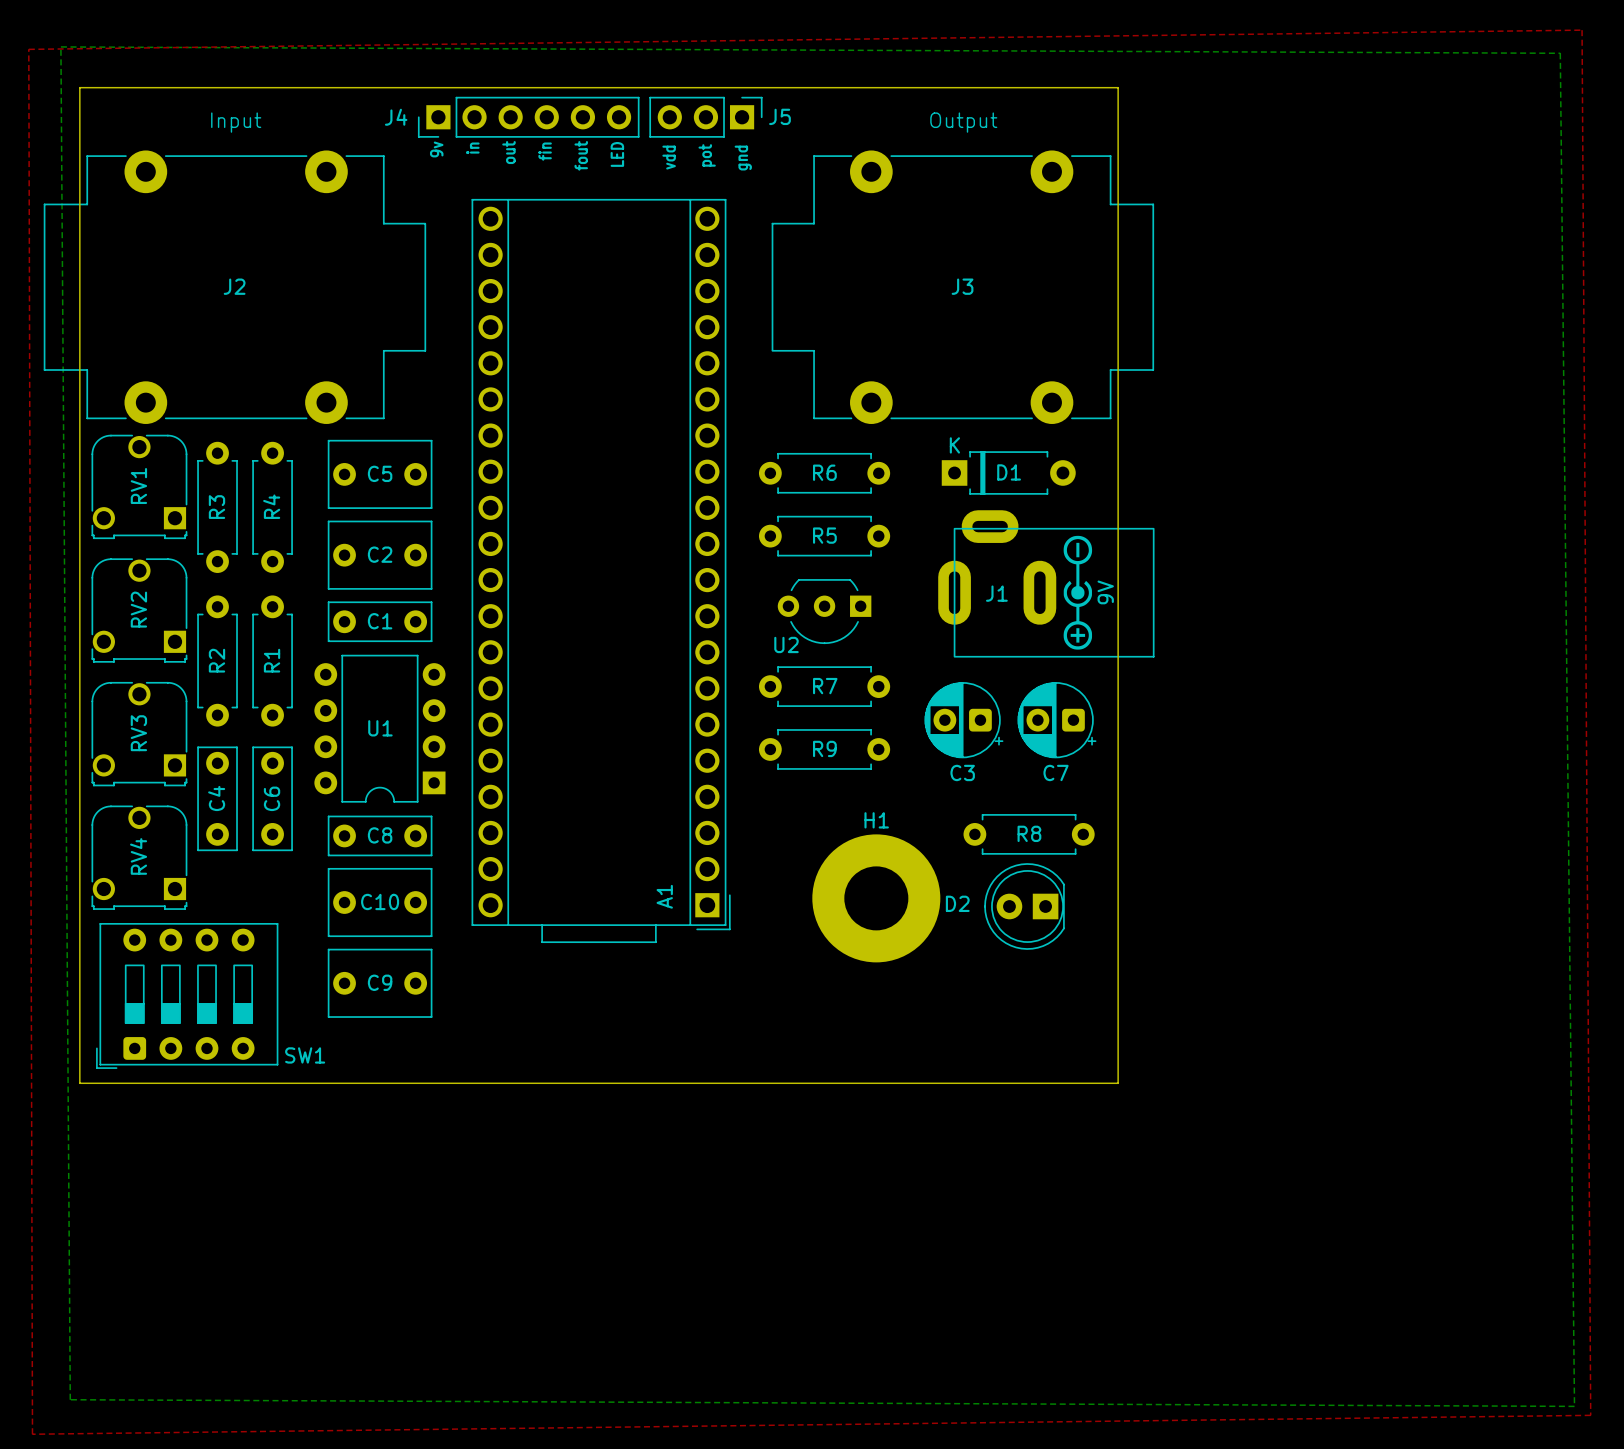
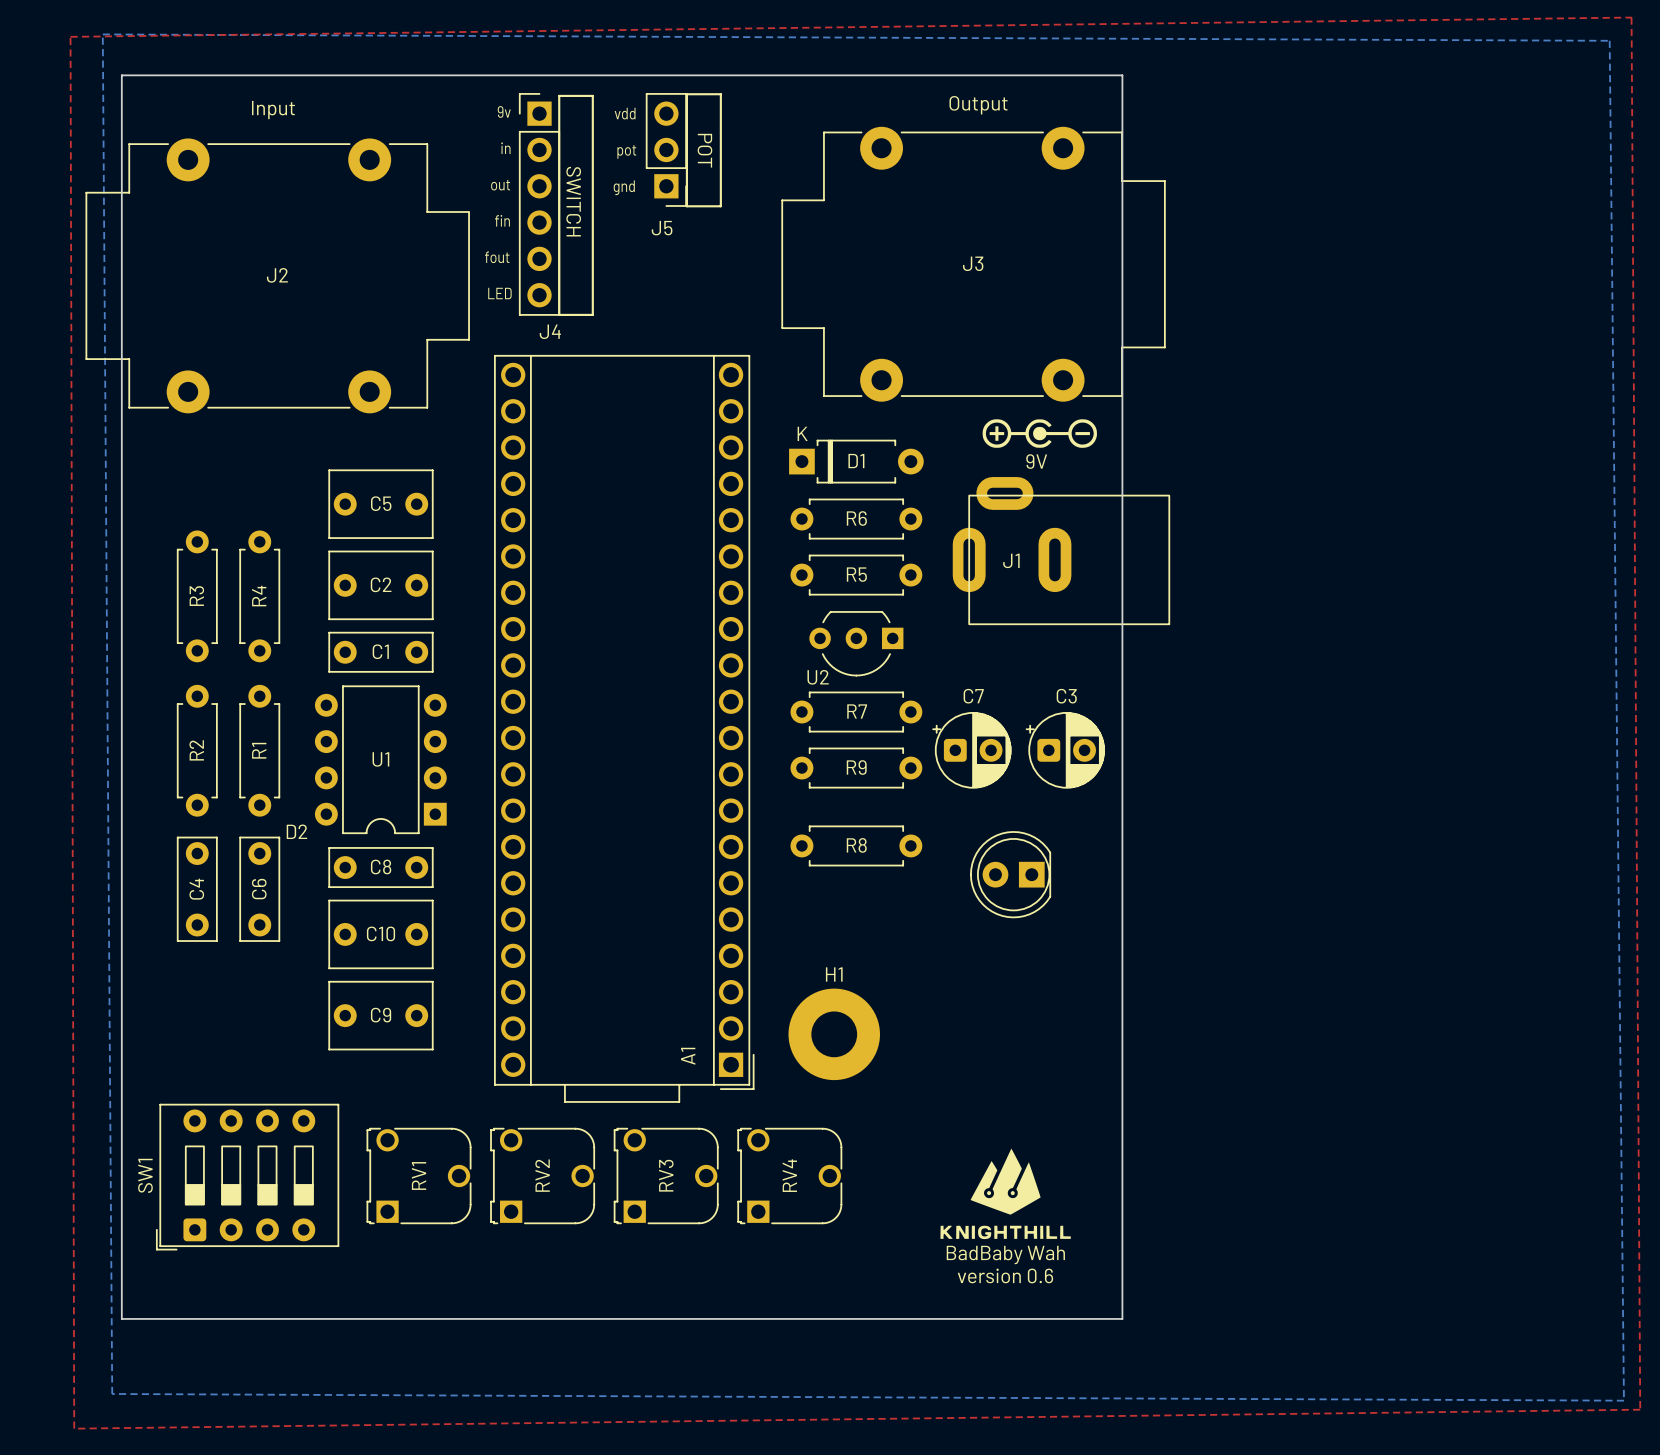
board edge: (1075, 87) (1118, 87) (1118, 1083) (79, 1083) -> (1122, 75) (1122, 1318) (121, 1318) (121, 1075)
line: none -> (686, 94) (720, 94) (720, 206) (686, 206) (686, 94)
line: none -> (559, 95) (592, 95) (592, 314) (559, 314) (559, 95)
J4 name position: J4 (396, 117) -> J4 (550, 331)
J4 rotation: 0° (528, 117) -> 90° clockwise (539, 204)
J5 rotation: 0° (705, 117) -> 90° clockwise (666, 149)
J5 position: (705, 117) -> (666, 149)
text position: Output (963, 122) -> Output (978, 105)
text rotation: 0° (472, 148) -> 90° clockwise (505, 148)
text rotation: 0° (436, 149) -> 90° clockwise (504, 111)
text position: 9v (436, 149) -> 9v (504, 111)
text rotation: 0° (545, 151) -> 90° clockwise (502, 220)
text position: fin (545, 151) -> fin (502, 220)
text rotation: 0° (508, 152) -> 90° clockwise (500, 185)
text position: out (508, 152) -> out (500, 185)
text rotation: 0° (617, 154) -> 90° clockwise (499, 293)
text position: LED (617, 154) -> LED (499, 293)
text rotation: 0° (581, 155) -> 90° clockwise (497, 257)
text position: fout (581, 155) -> fout (497, 257)
text rotation: 0° (707, 155) -> 90° clockwise (626, 151)
text position: pot (707, 155) -> pot (626, 151)
text rotation: 0° (669, 157) -> 90° clockwise (625, 113)
text position: vdd (669, 157) -> vdd (625, 113)
text rotation: 0° (743, 158) -> 90° clockwise (624, 187)
text position: gnd (743, 158) -> gnd (624, 187)
text: none -> POT (704, 150)
text: none -> SWITCH (573, 201)
J3 position: (962, 287) -> (973, 264)
drawing: none -> [982, 419, 1097, 448]
D1 position: (1008, 472) -> (856, 461)
R6 position: (824, 473) -> (856, 519)
C5 position: (380, 474) -> (380, 504)
RV1 rotation: 0° (139, 486) -> 90° clockwise (419, 1176)
RV1 position: (139, 486) -> (419, 1176)
R3 position: (217, 507) -> (197, 596)
R4 position: (272, 507) -> (259, 596)
drawing: [1063, 535, 1093, 650] -> none
R5 position: (824, 536) -> (856, 575)
C2 position: (380, 555) -> (380, 585)
A1 position: (601, 570) -> (624, 728)
J1 position: (1046, 583) -> (1061, 551)
text rotation: 0° (1105, 592) -> 90° clockwise (1036, 461)
text position: 9V (1105, 592) -> 9V (1036, 461)
RV2 rotation: 0° (139, 610) -> 90° clockwise (542, 1176)
RV2 position: (139, 610) -> (542, 1176)
U2 position: (824, 611) -> (856, 643)
C1 position: (380, 621) -> (380, 652)
R2 position: (217, 661) -> (197, 750)
R1 position: (272, 661) -> (259, 750)
R7 position: (824, 686) -> (856, 712)
C3 rotation: 0° (963, 720) -> 180° (1065, 750)
C3 position: (963, 720) -> (1065, 750)
C7 rotation: 0° (1057, 720) -> 180° (971, 750)
C7 position: (1057, 720) -> (971, 750)
U1 position: (379, 728) -> (380, 759)
RV3 rotation: 0° (139, 734) -> 90° clockwise (666, 1176)
RV3 position: (139, 734) -> (666, 1176)
R9 position: (824, 749) -> (856, 768)
C4 position: (217, 798) -> (197, 889)
C6 position: (272, 798) -> (259, 889)
H1 footprint: [812, 834, 941, 963] -> [788, 988, 880, 1081]
R8 position: (1029, 834) -> (856, 845)
C8 position: (380, 835) -> (380, 867)
RV4 rotation: 0° (139, 857) -> 90° clockwise (789, 1176)
RV4 position: (139, 857) -> (789, 1176)
C10 position: (380, 902) -> (380, 934)
D2 name position: D2 (957, 903) -> D2 (296, 831)
D2 position: (1024, 906) -> (1010, 874)
C9 position: (380, 983) -> (380, 1015)
SW1 position: (187, 995) -> (247, 1177)
SW1 name rotation: 0° (305, 1055) -> 90° counterclockwise (145, 1175)
SW1 name position: SW1 (305, 1055) -> SW1 (145, 1175)
drawing: none -> [940, 1148, 1071, 1240]
text: none -> BadBaby Wah (1005, 1254)
text: none -> version 0.6 (1005, 1275)

